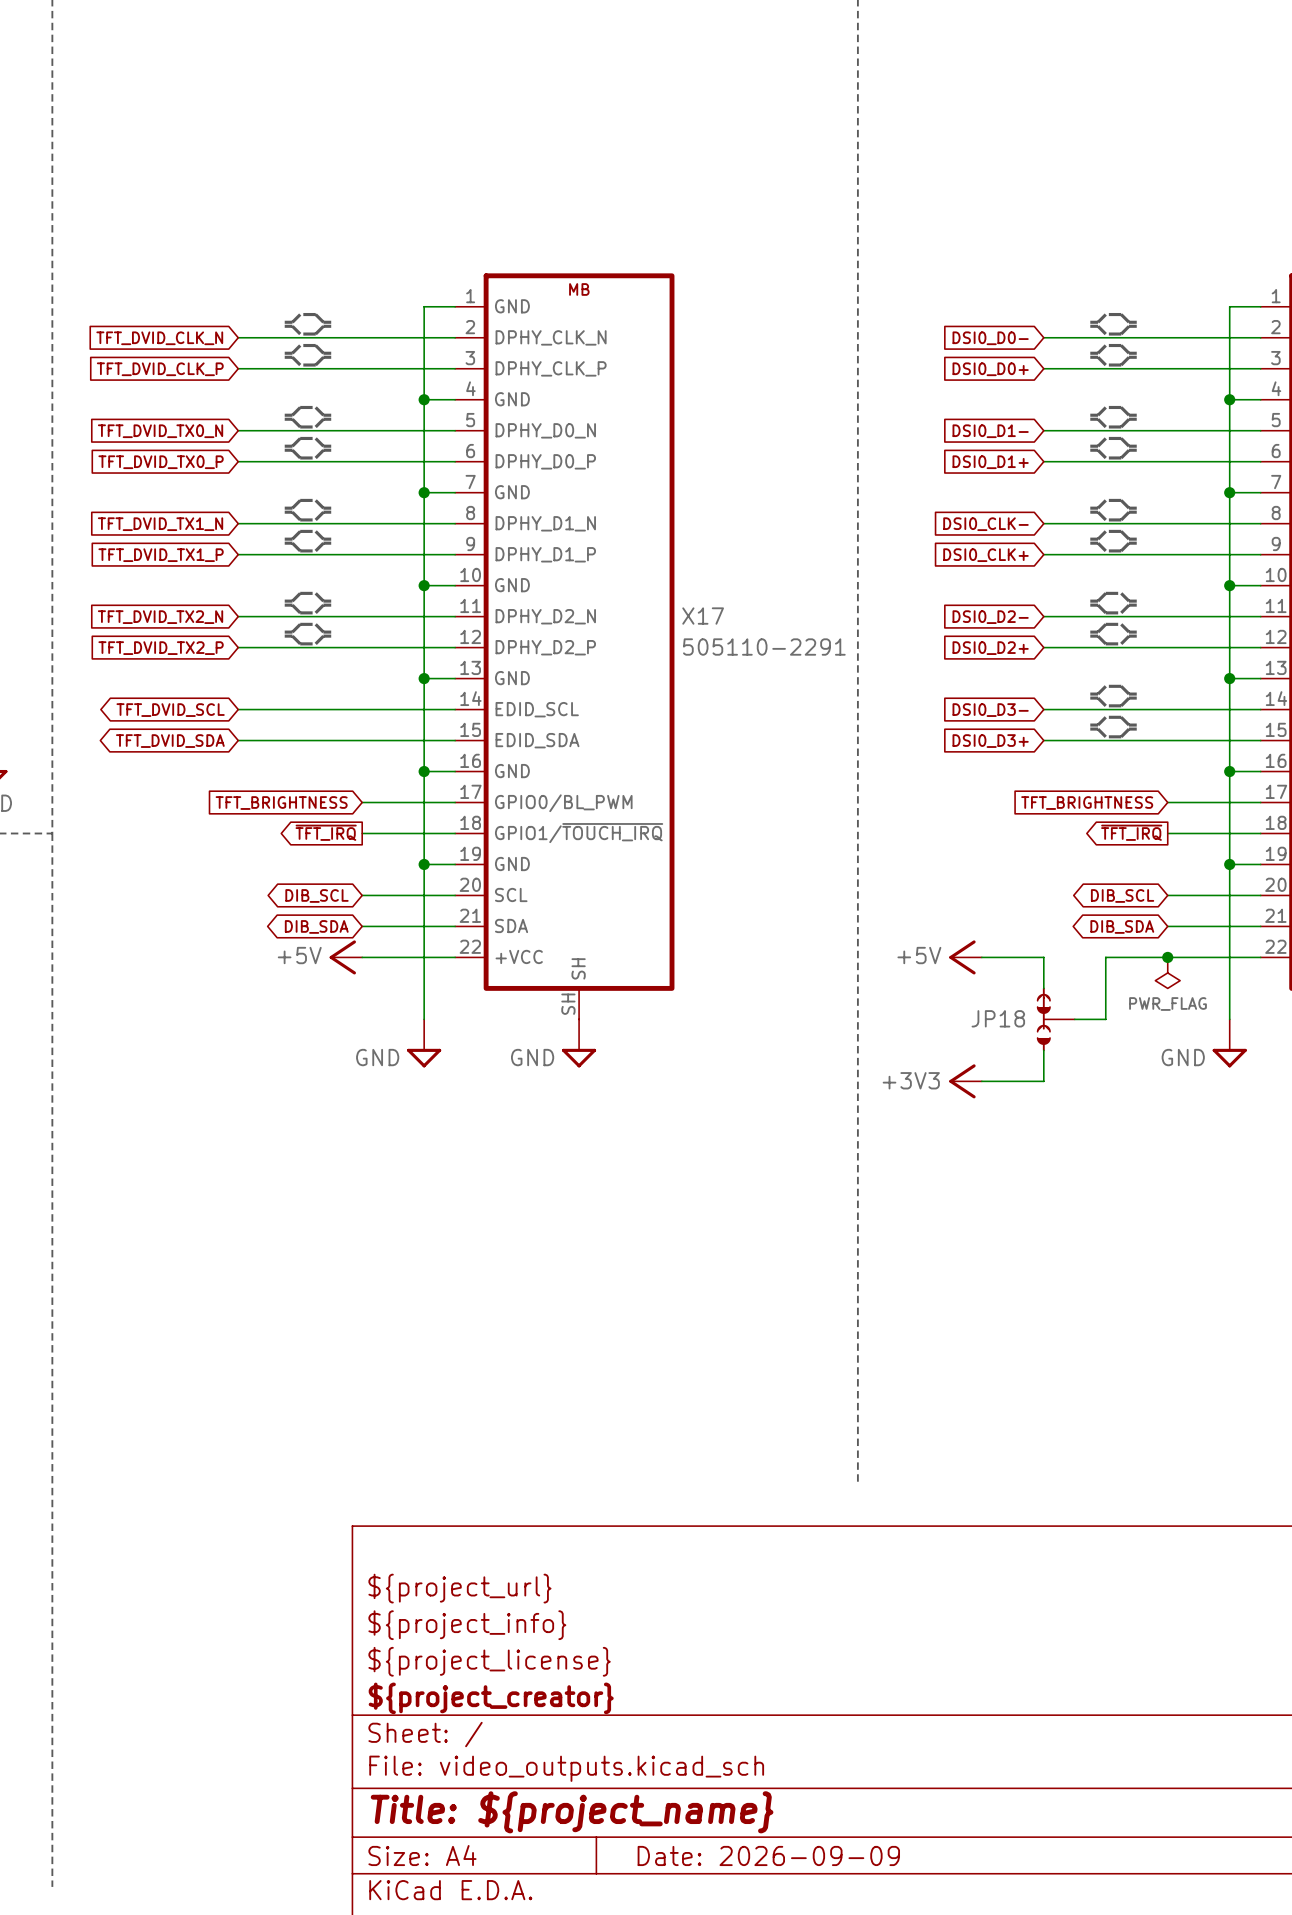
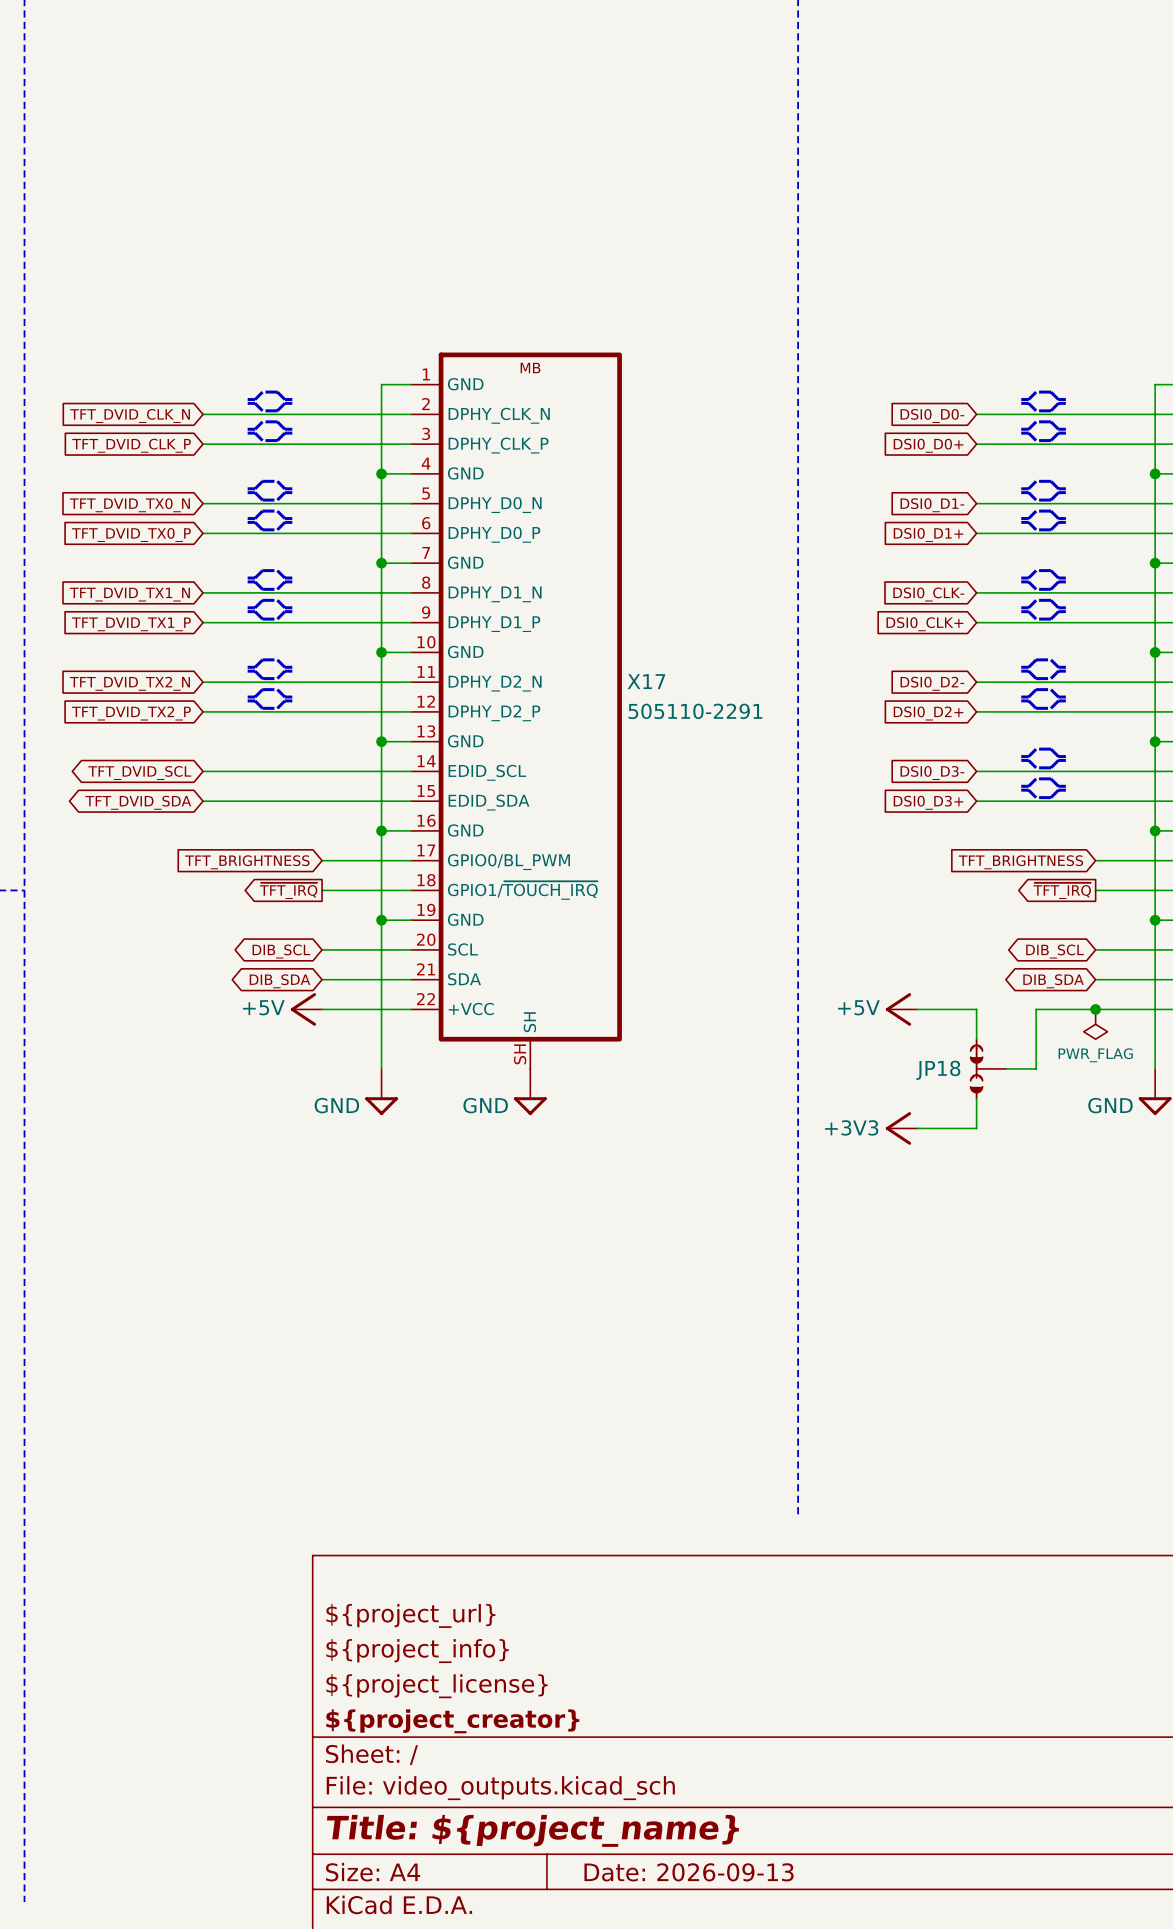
title block: Date: 2026-09-09 (768, 1855) -> Date: 2026-09-13 (689, 1872)

